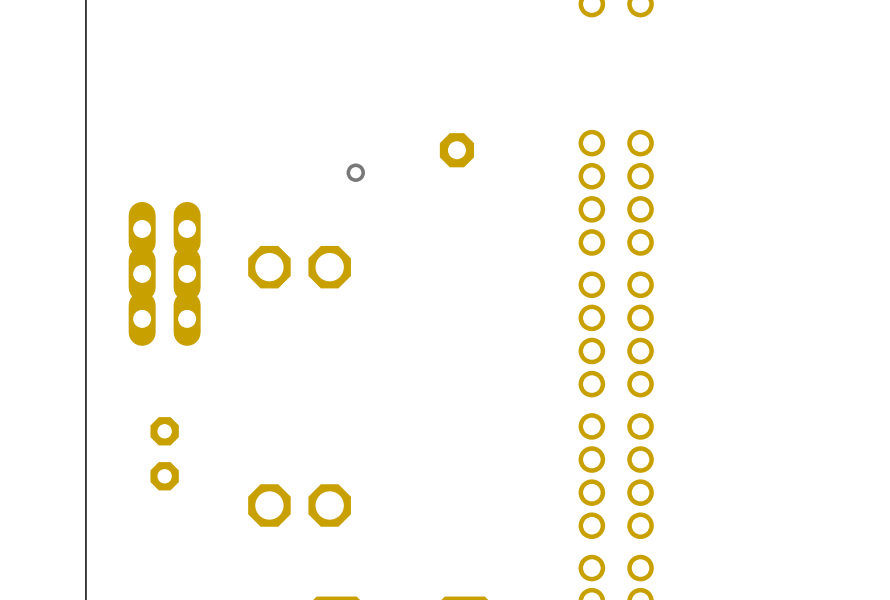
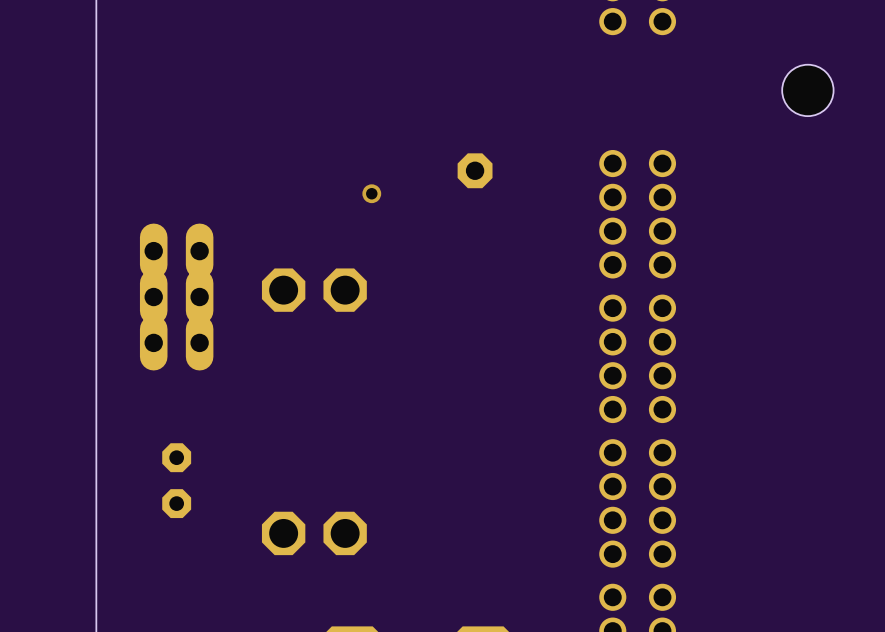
hole: none -> (807, 90)

